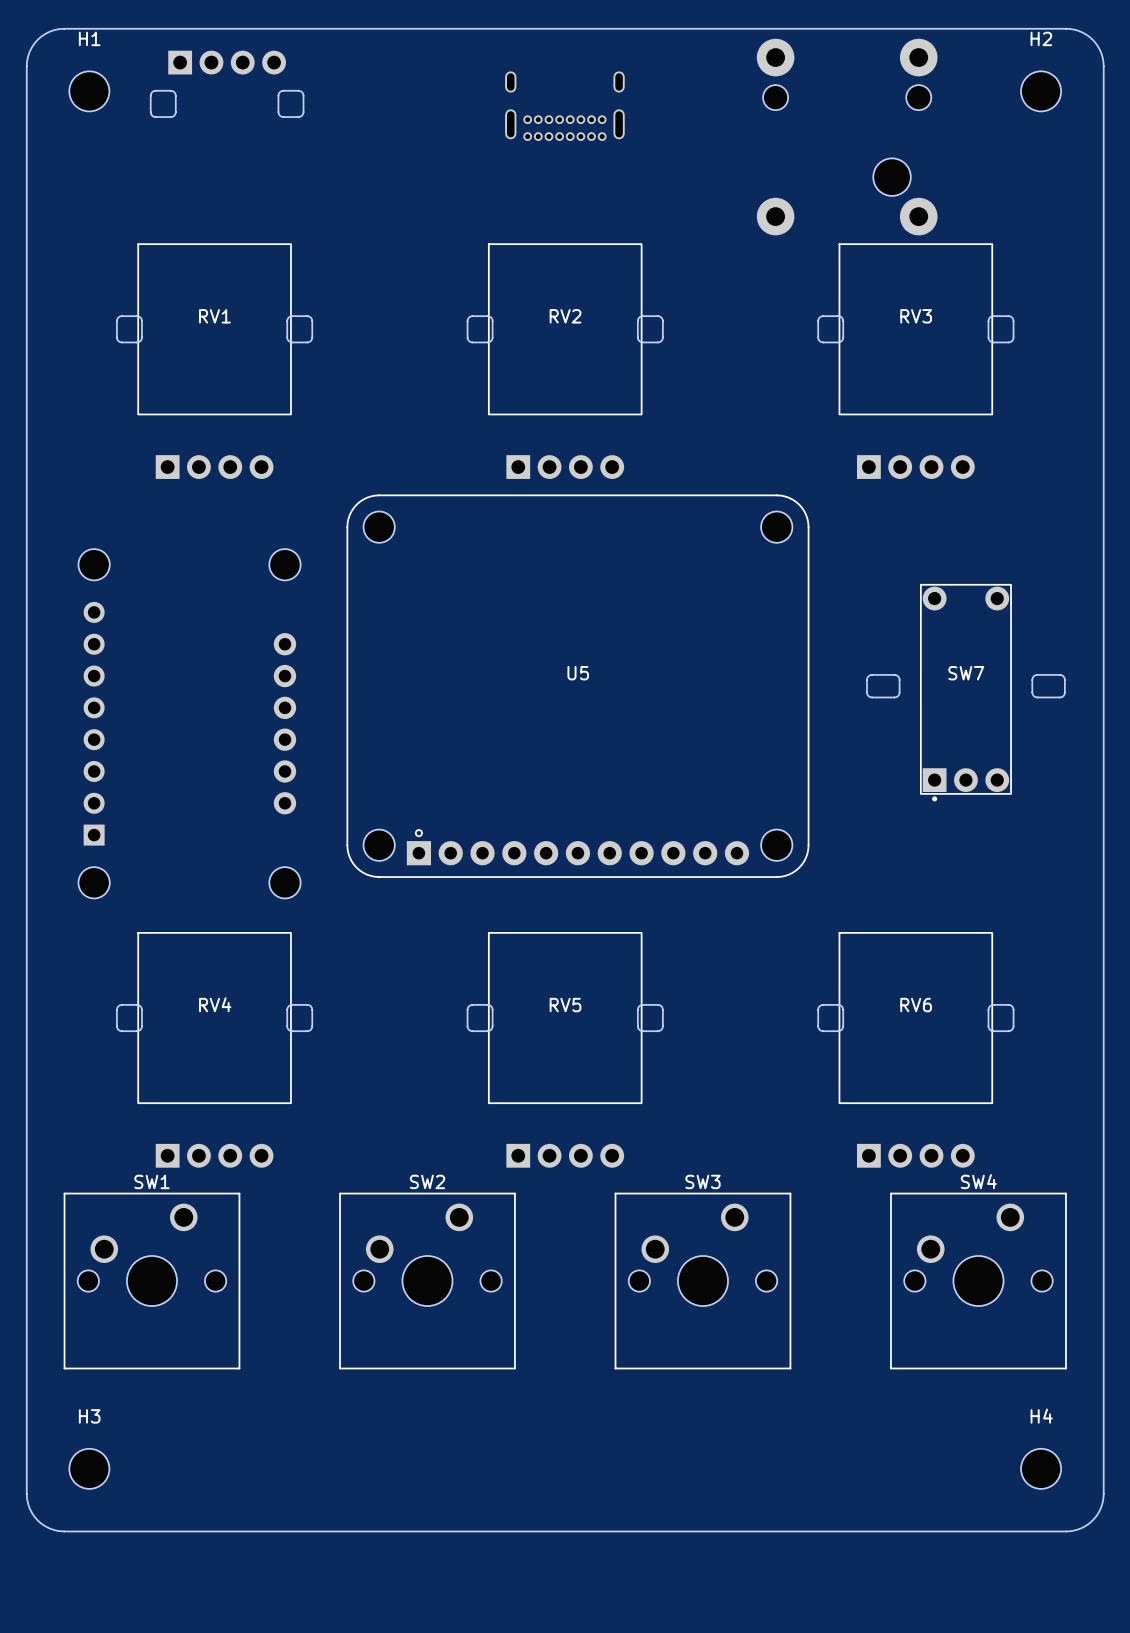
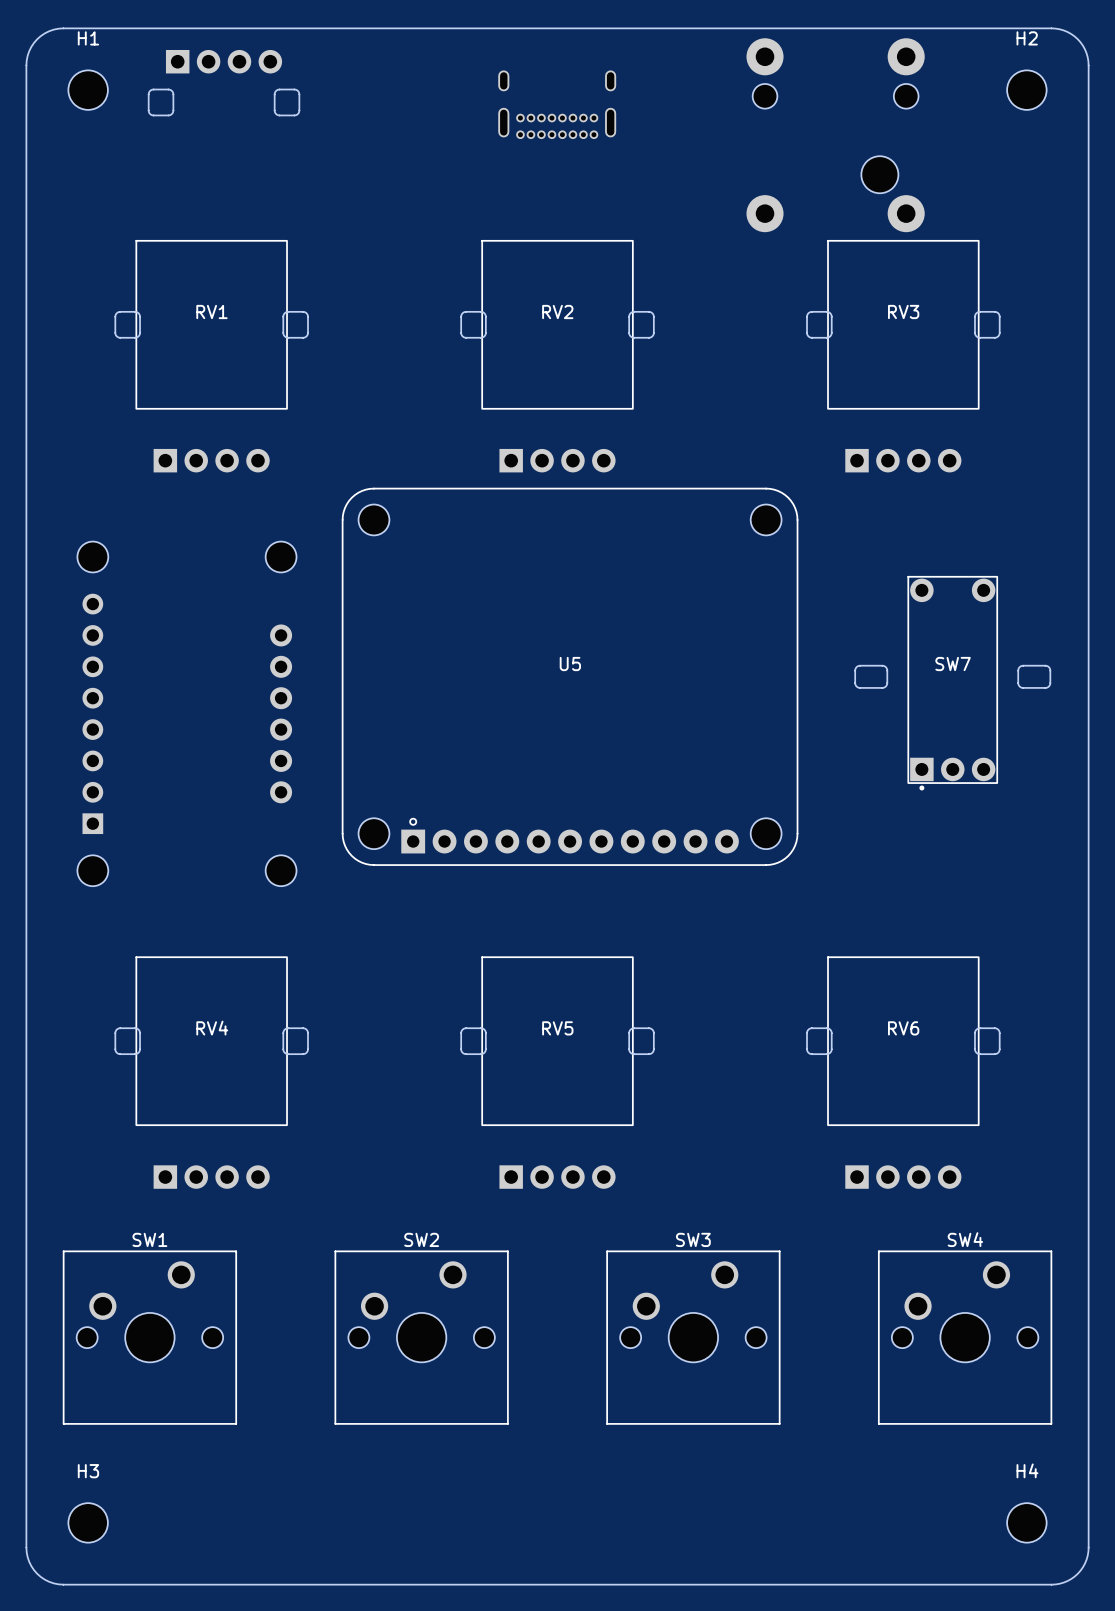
RV4 position: (214, 1049) -> (211, 1072)
RV5 position: (565, 1049) -> (557, 1072)
RV6 position: (915, 1049) -> (903, 1072)
SW1 position: (151, 1281) -> (149, 1337)
SW2 position: (427, 1281) -> (421, 1337)
SW3 position: (702, 1281) -> (693, 1337)
SW4 position: (978, 1281) -> (965, 1337)
H3 position: (89, 1468) -> (88, 1522)
H4 position: (1041, 1468) -> (1026, 1522)
board edge: (26, 1493) (29, 1508) (37, 1520) (49, 1528) (64, 1531) (1066, 1531) (1082, 1527) (1092, 1520) (1099, 1510) (1103, 1493) -> (26, 1473) (27, 1557) (34, 1570) (40, 1577) (53, 1583) (63, 1584) (1055, 1584) (1074, 1576) (1086, 1559) (1088, 1547) (1088, 1473)

